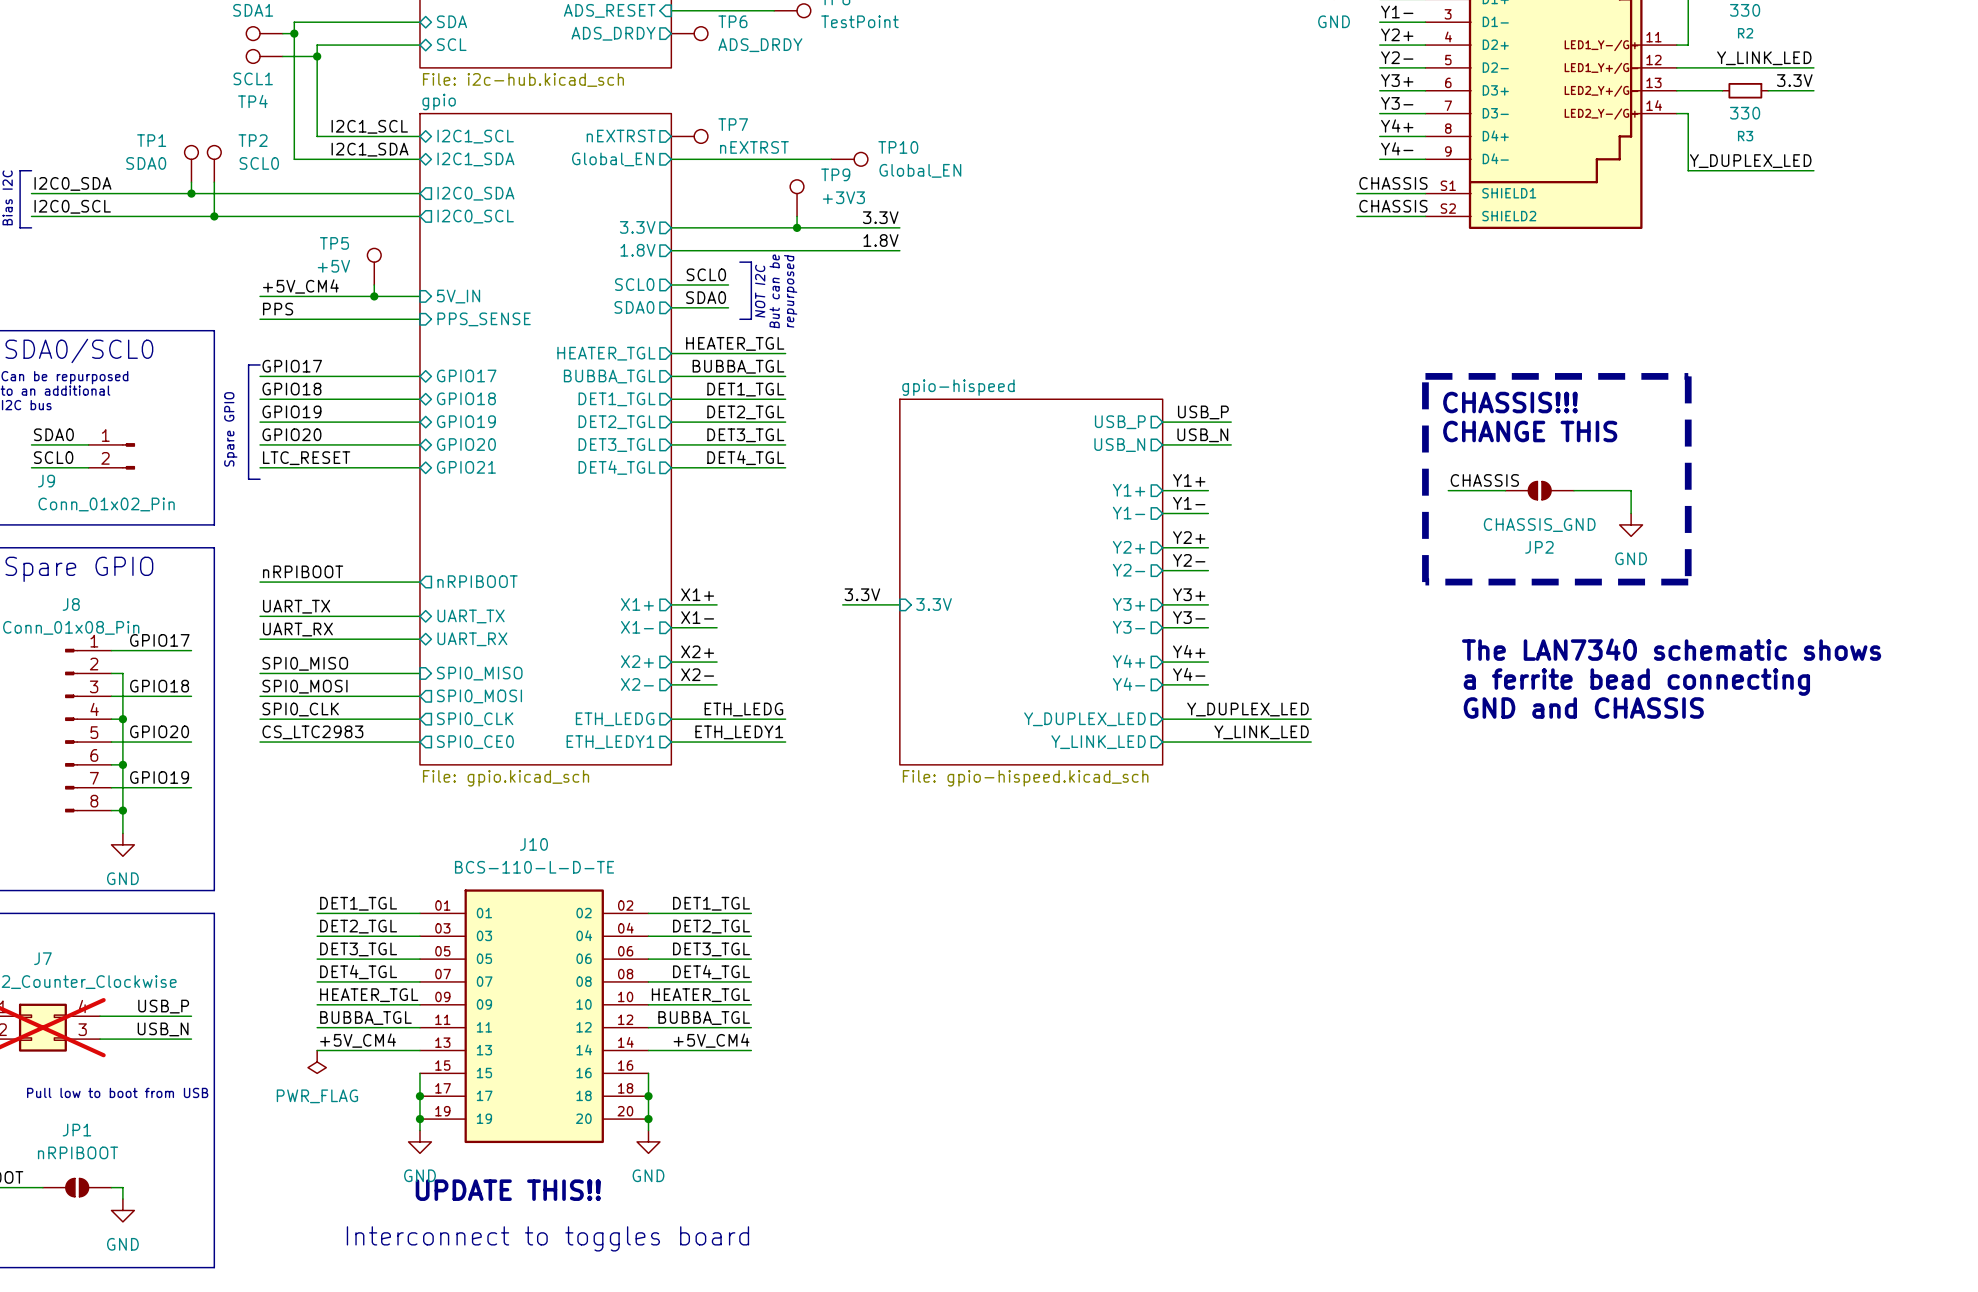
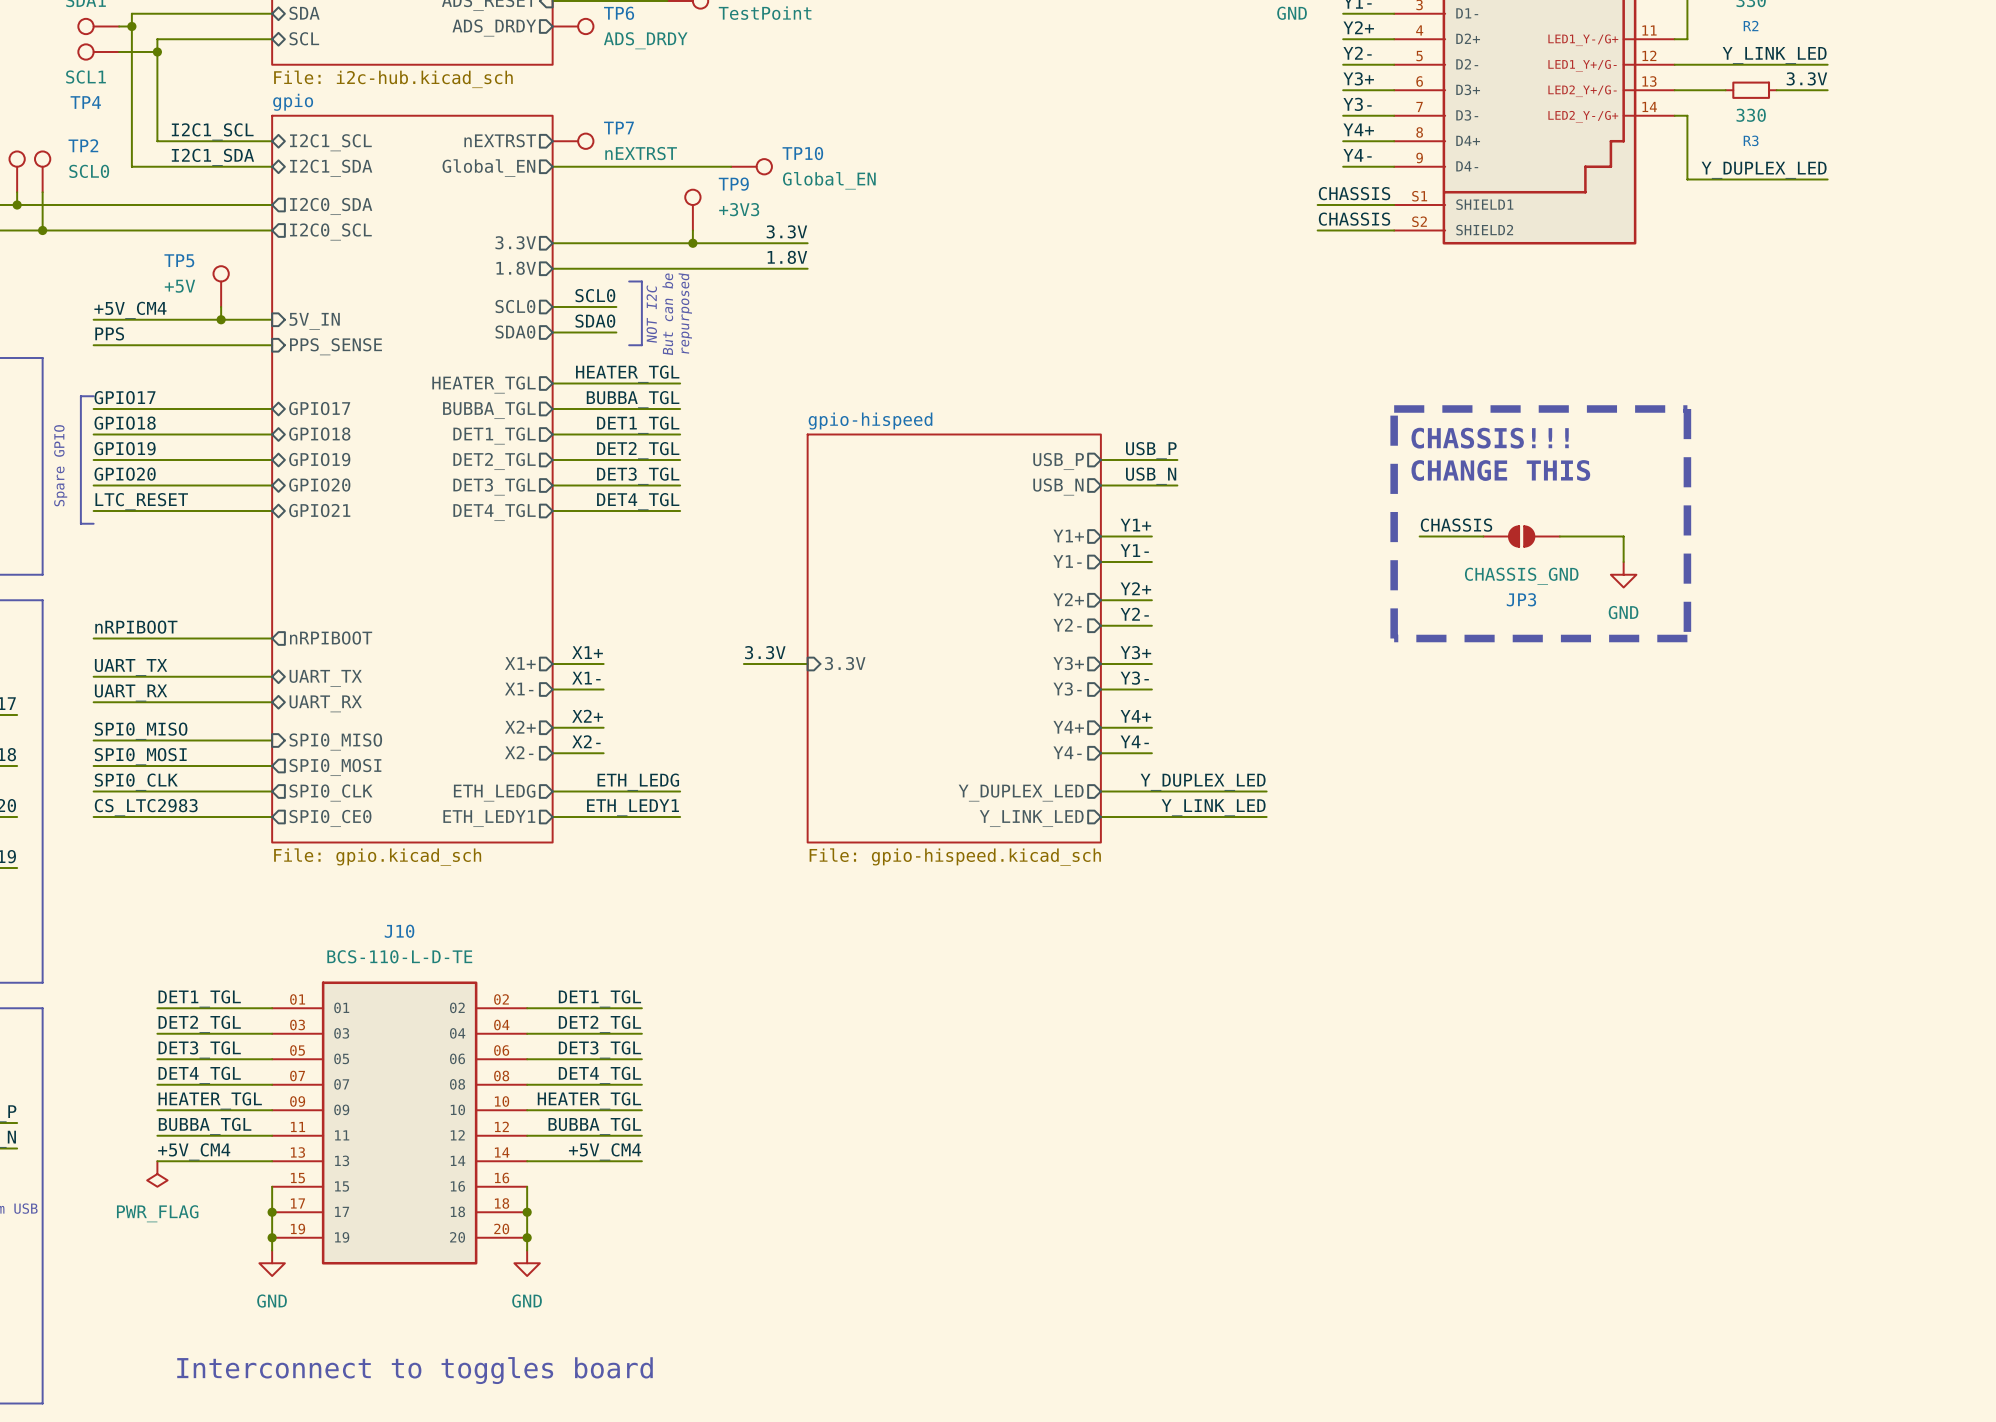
JP2 name: JP2 (1539, 547) -> JP3 (1521, 599)
text: The LAN7340 schematic shows (1671, 649) -> none
text: a ferrite bead connecting (1636, 682) -> none
text: GND and CHASSIS (1583, 708) -> none
text: UPDATE THIS!! (508, 1190) -> none

